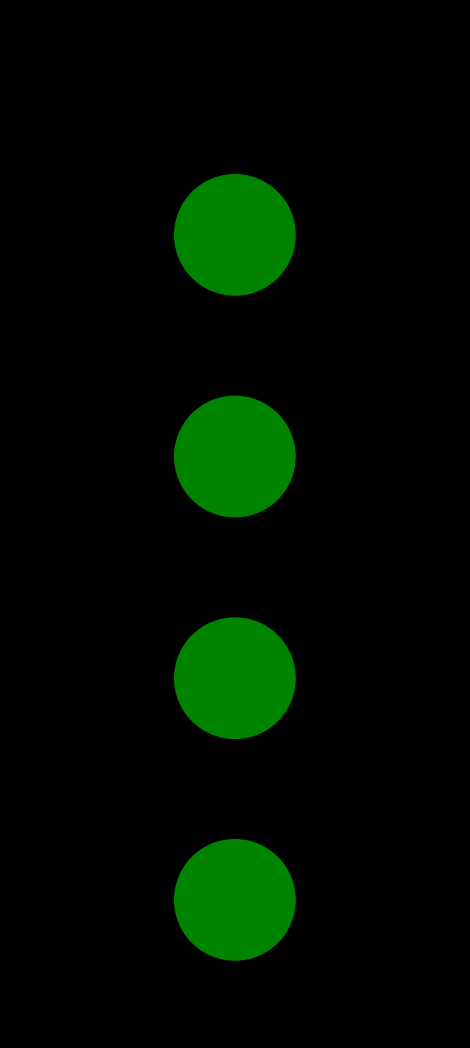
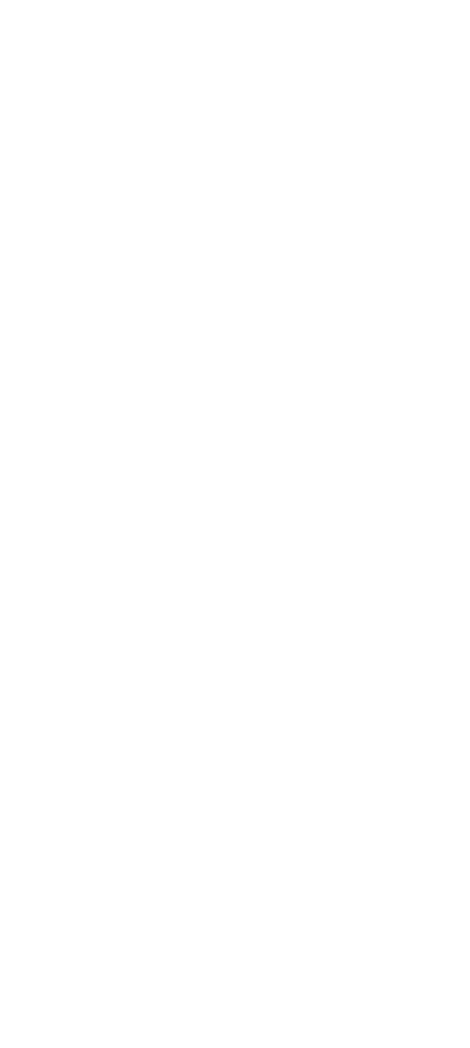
part: (234, 234) -> none
part: (234, 456) -> none
part: (234, 678) -> none
part: (234, 899) -> none

